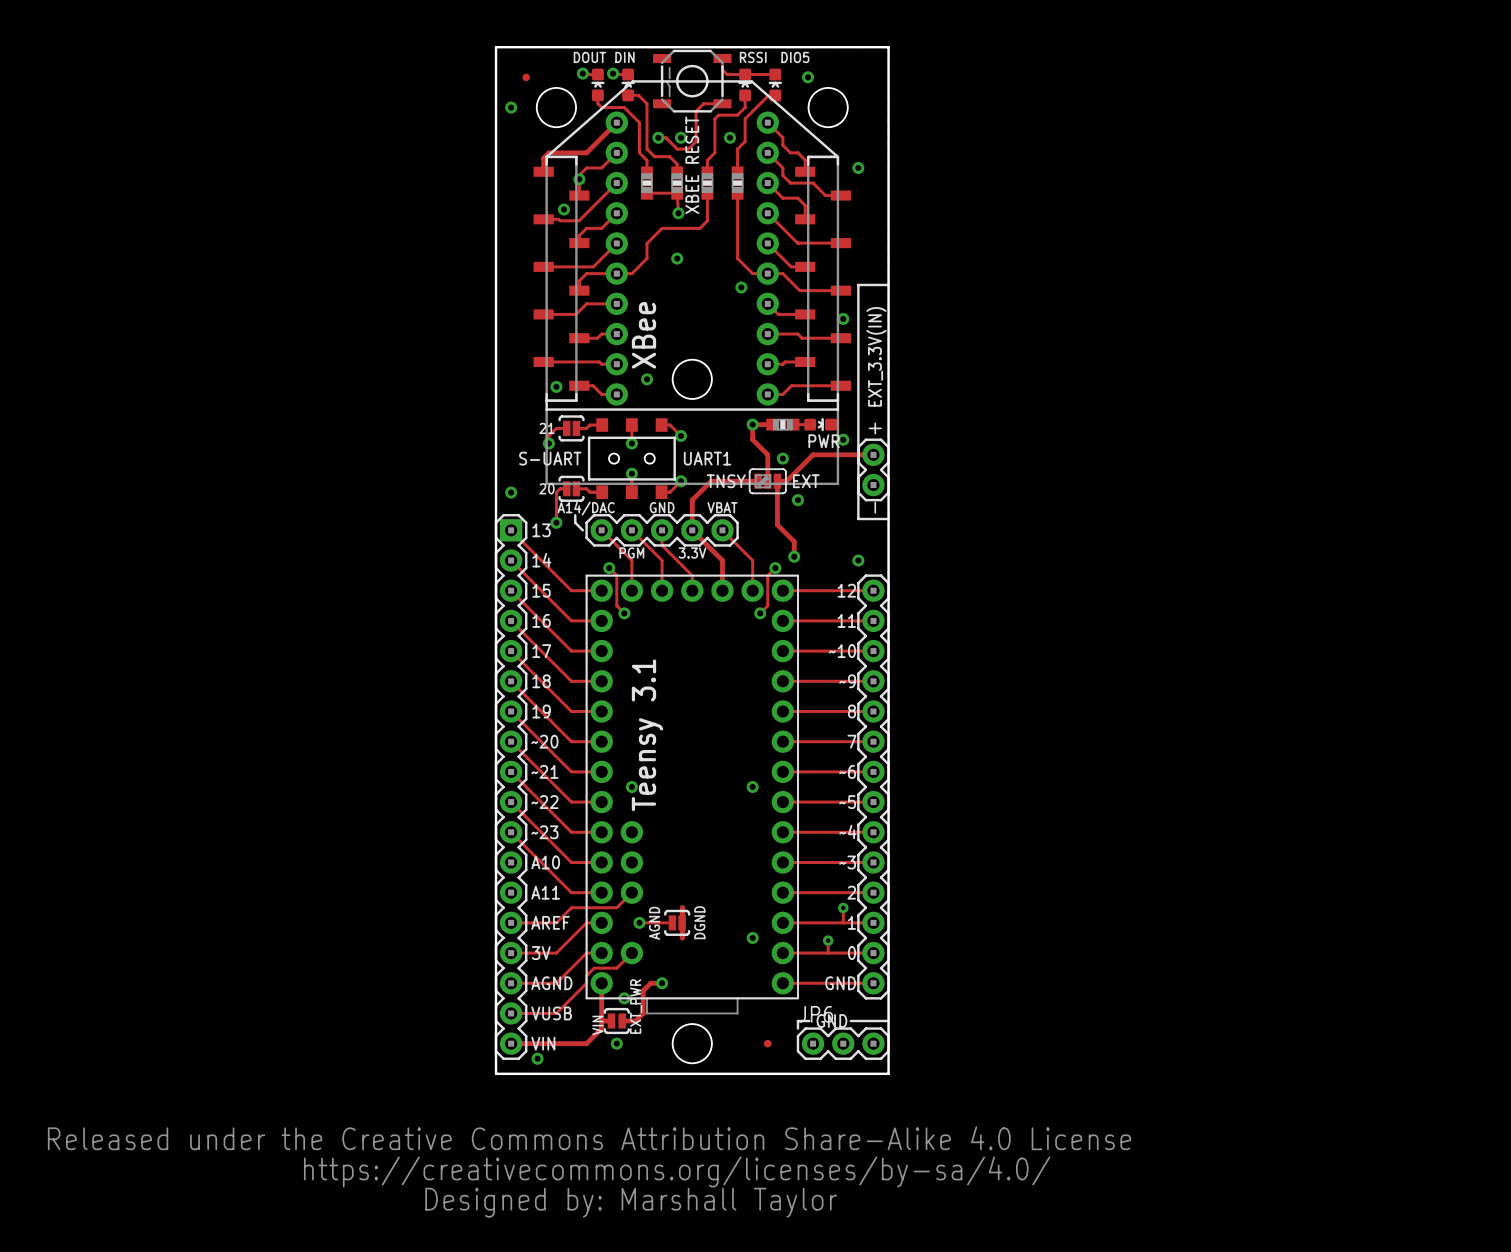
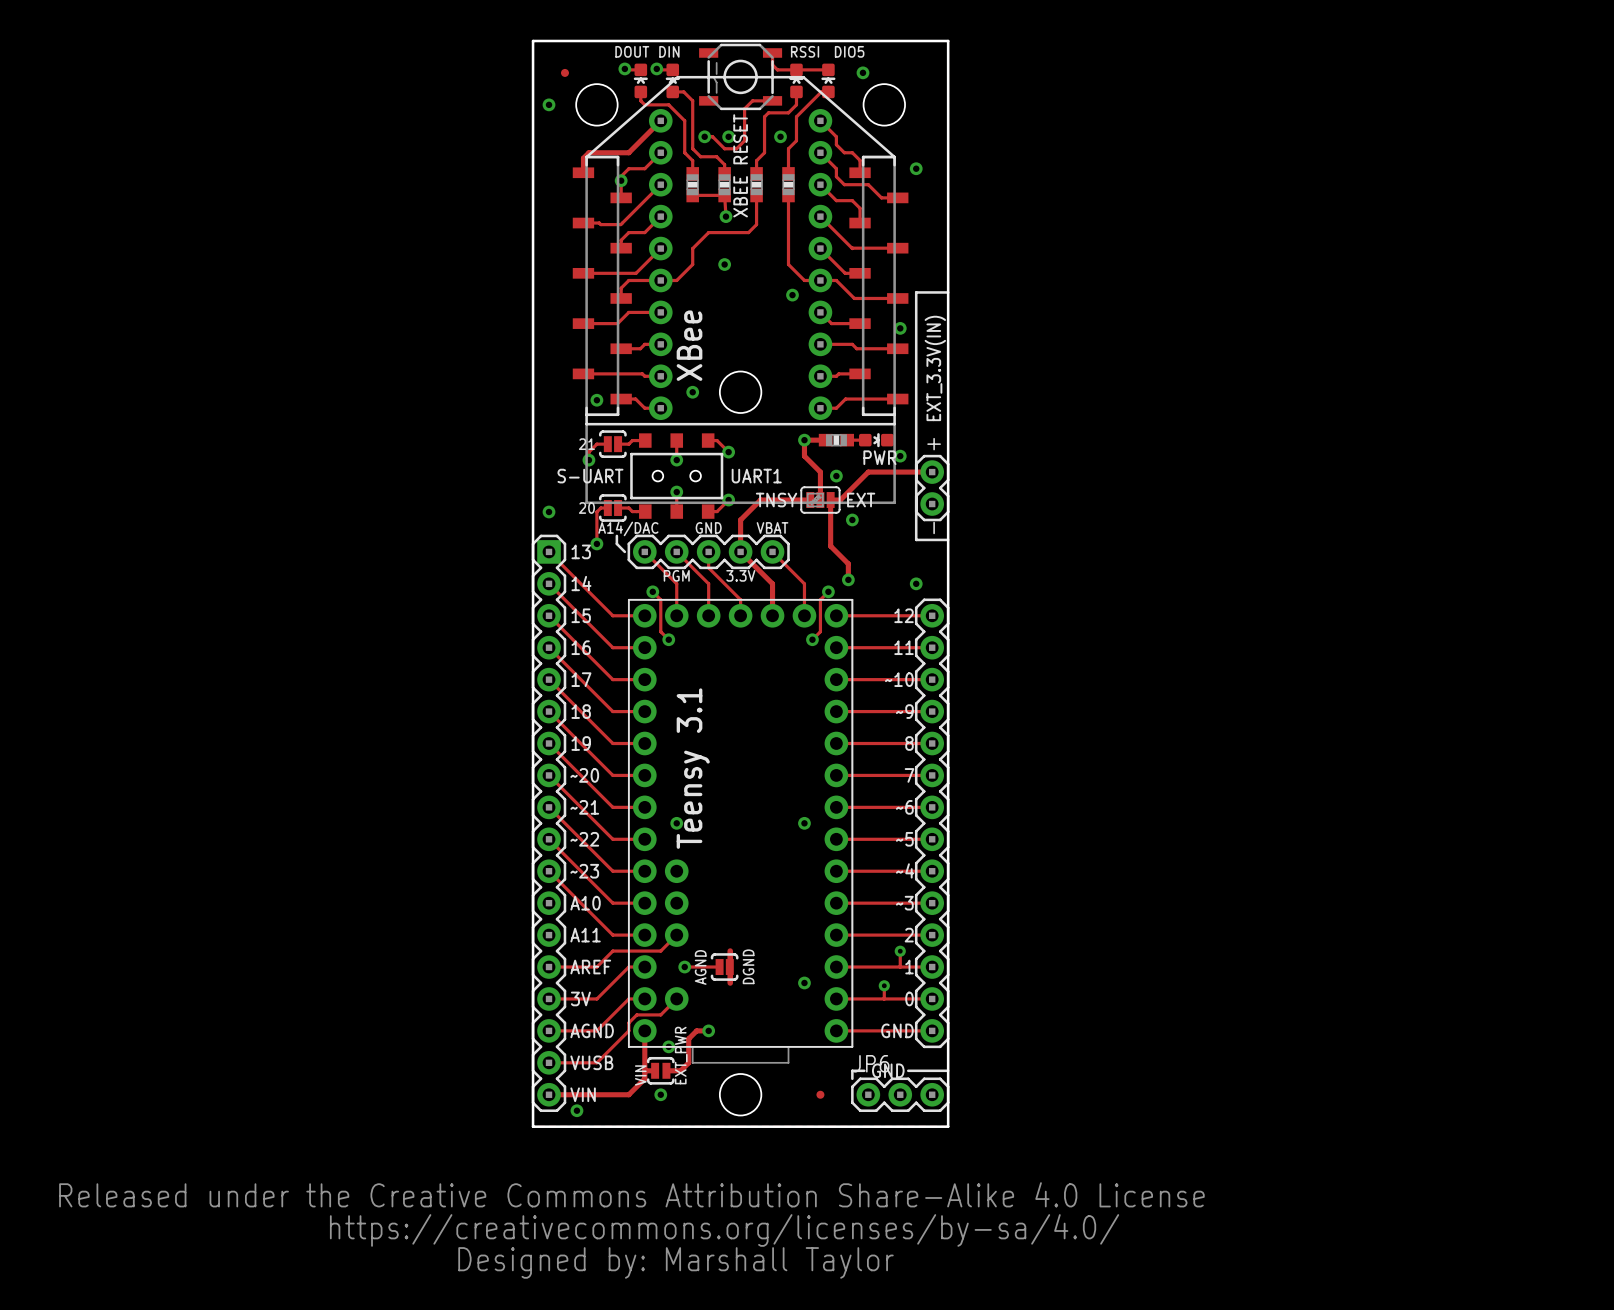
via: (563, 209) -> none

